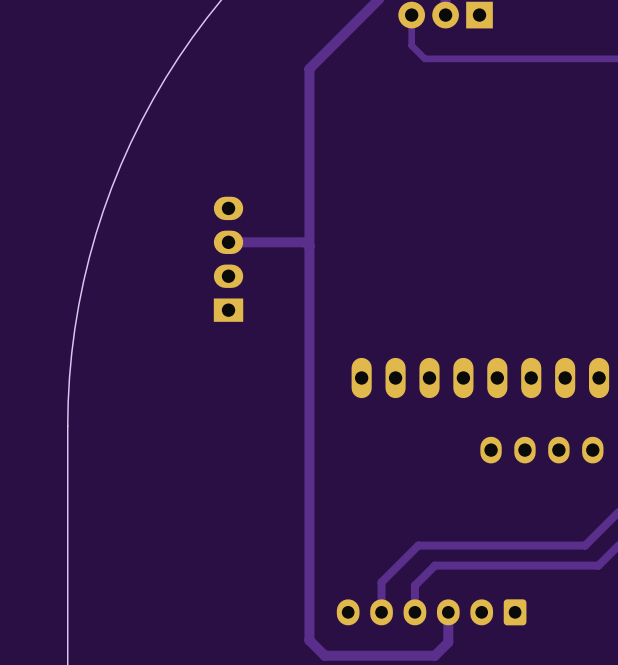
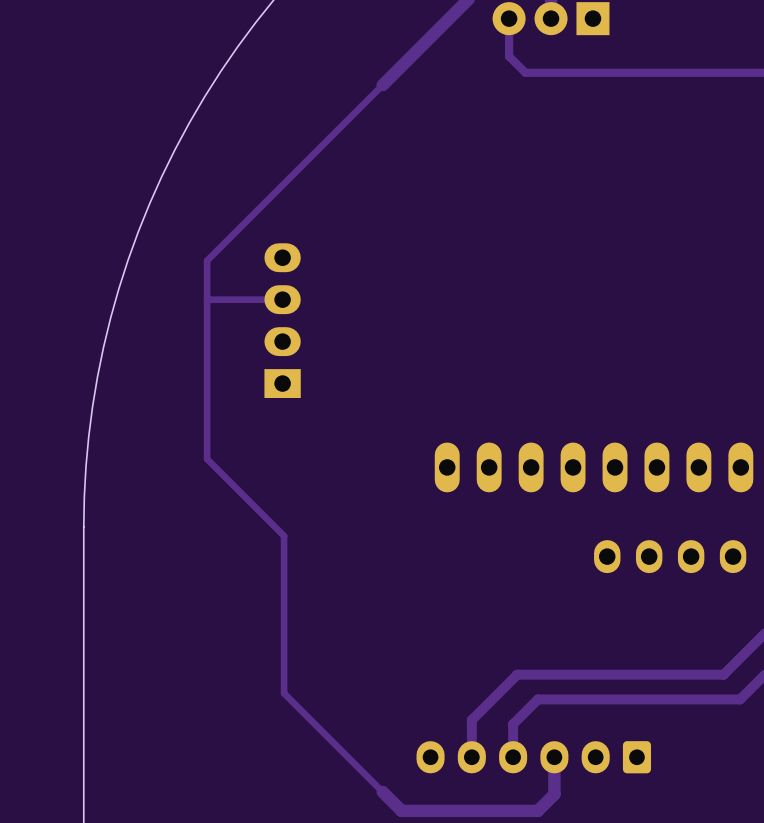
track: (309, 68) (309, 640) -> (382, 85) (207, 260) (207, 459) (284, 536) (284, 693) (382, 791)
track: (228, 242) (305, 242) (309, 246) -> (282, 299) (207, 299)

